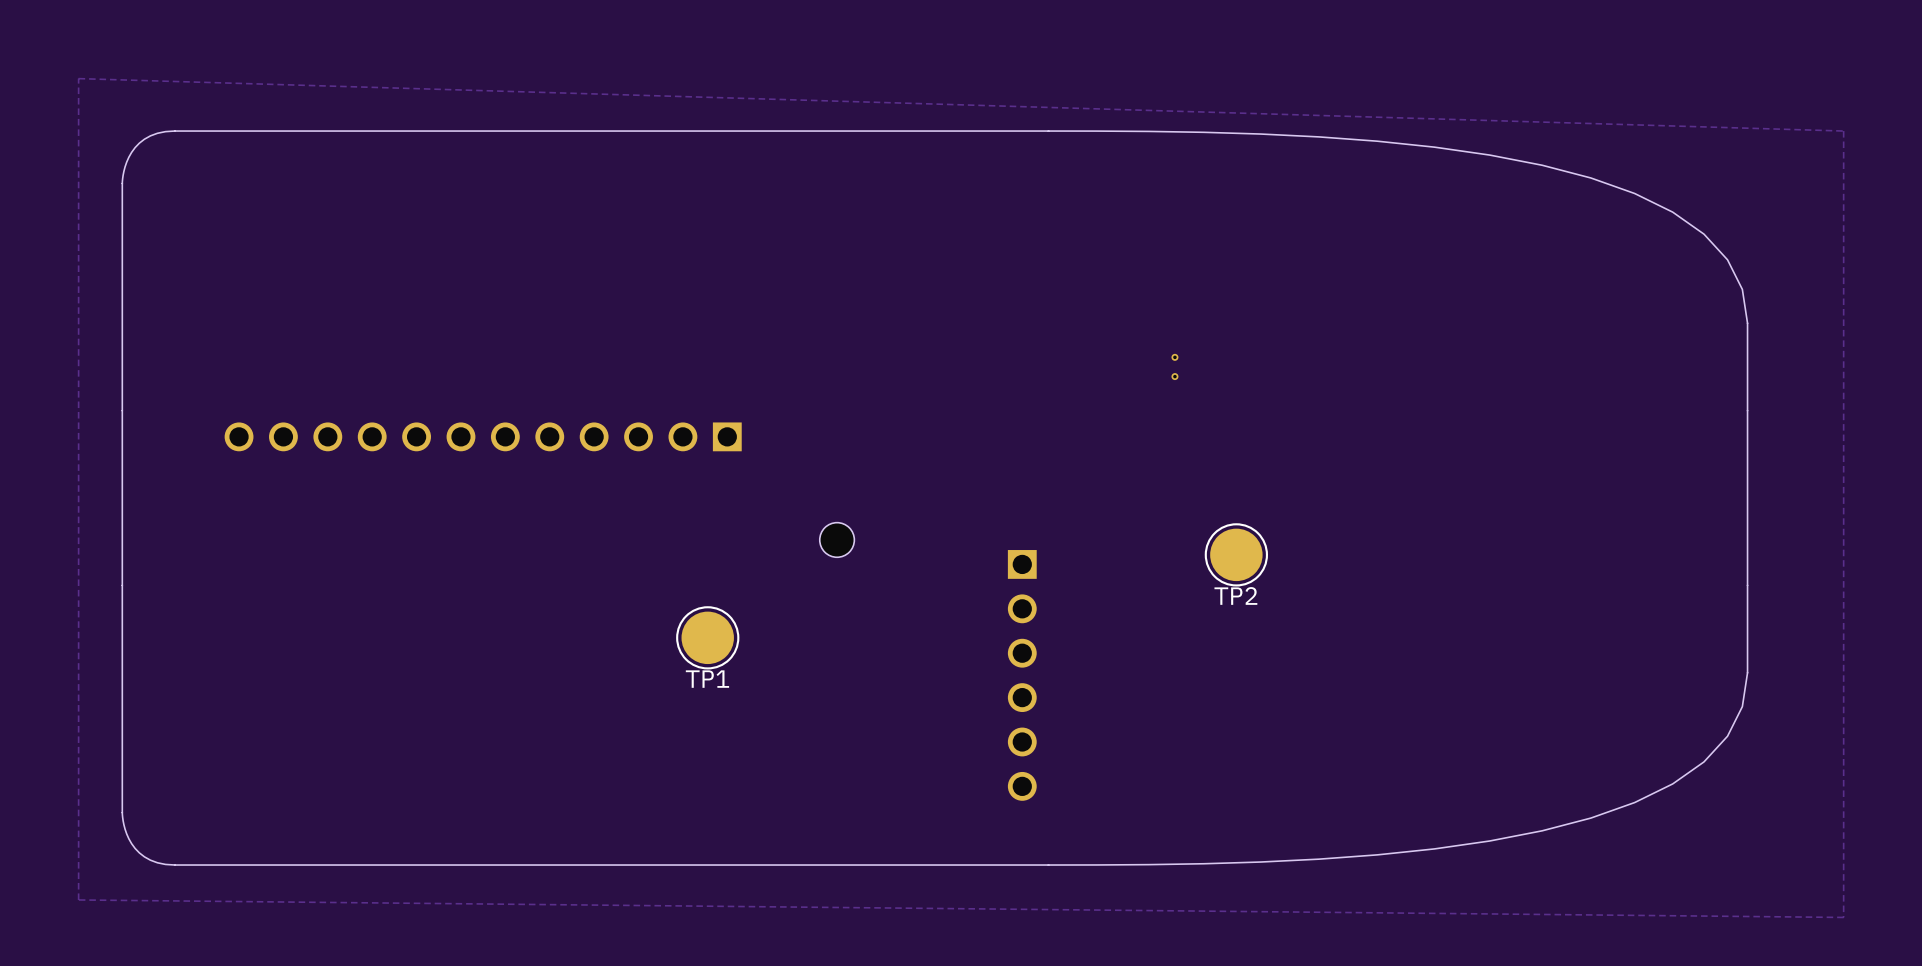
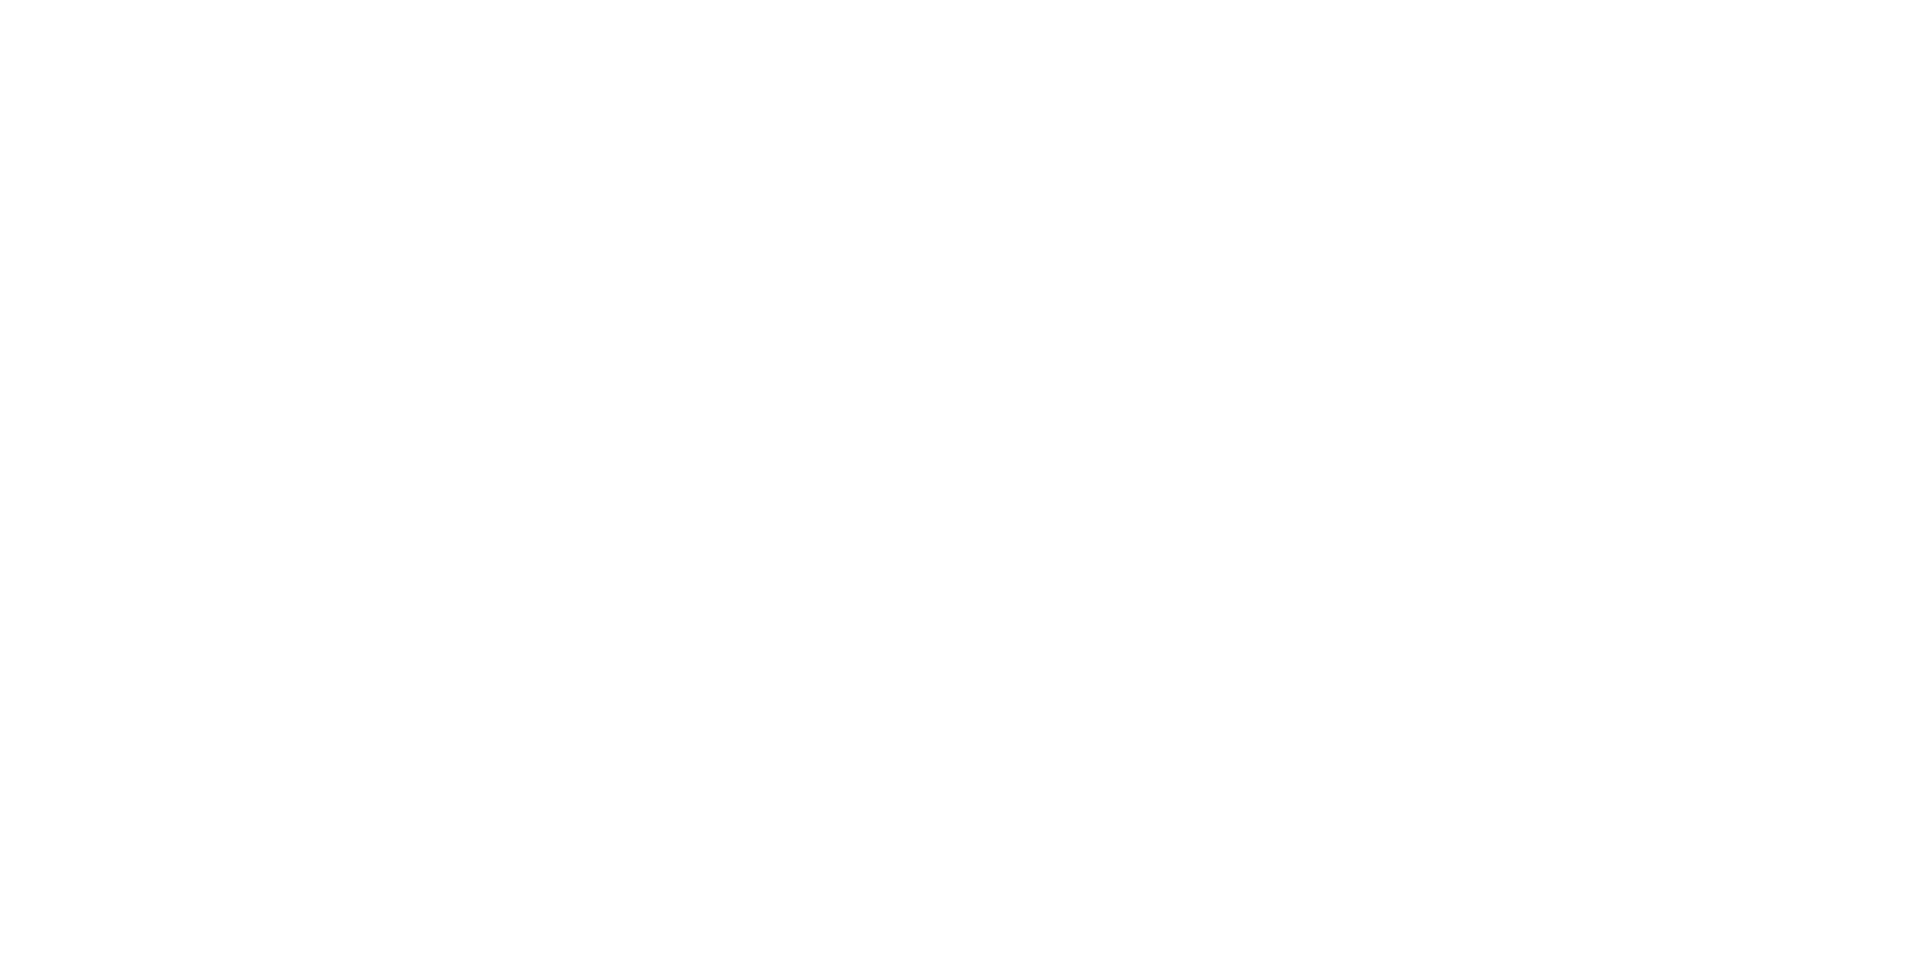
zone outline: (78, 78) (78, 899) (1843, 917) (1843, 131) (78, 78) -> none
board edge: (1048, 131) (174, 131) (157, 133) (139, 143) (126, 162) (122, 183) (122, 812) (126, 833) (135, 848) (150, 860) (174, 865) (1096, 864) (1203, 863) (1319, 859) (1434, 848) (1542, 830) (1590, 818) (1634, 802) (1672, 783) (1703, 761) (1727, 736) (1742, 706) (1747, 672) (1747, 323) (1742, 289) (1727, 259) (1703, 234) (1672, 212) (1634, 193) (1590, 177) (1542, 165) (1489, 155) (1434, 147) (1319, 136) (1203, 132) (1048, 131) -> none
part: (1174, 366) -> none
part: (483, 436) -> none
part: (837, 539) -> none
TP2: (1236, 554) -> none
TP1: (707, 637) -> none
part: (1022, 675) -> none

